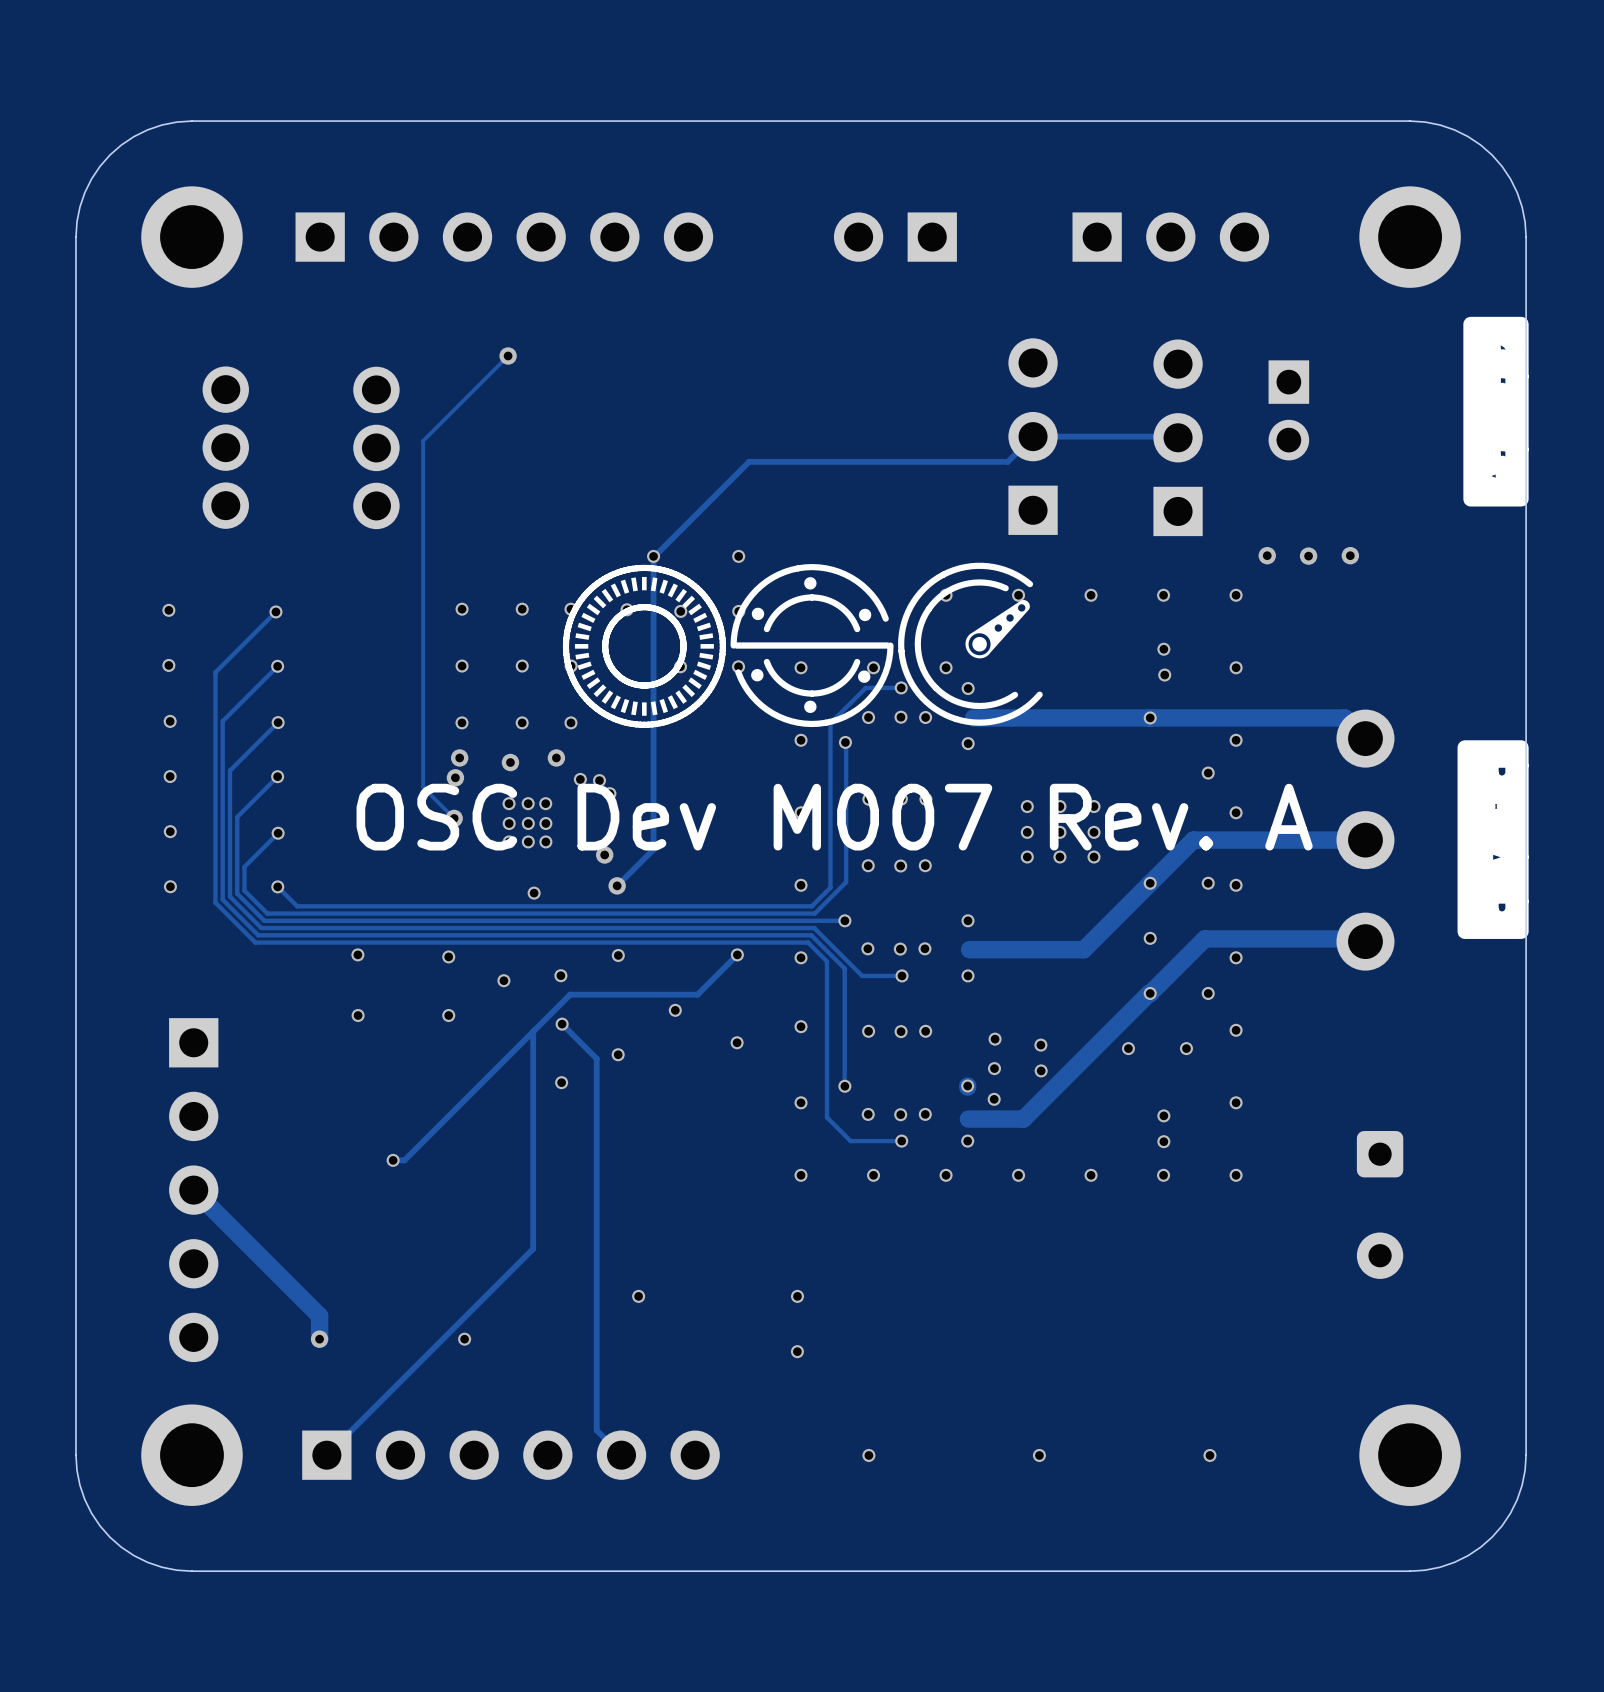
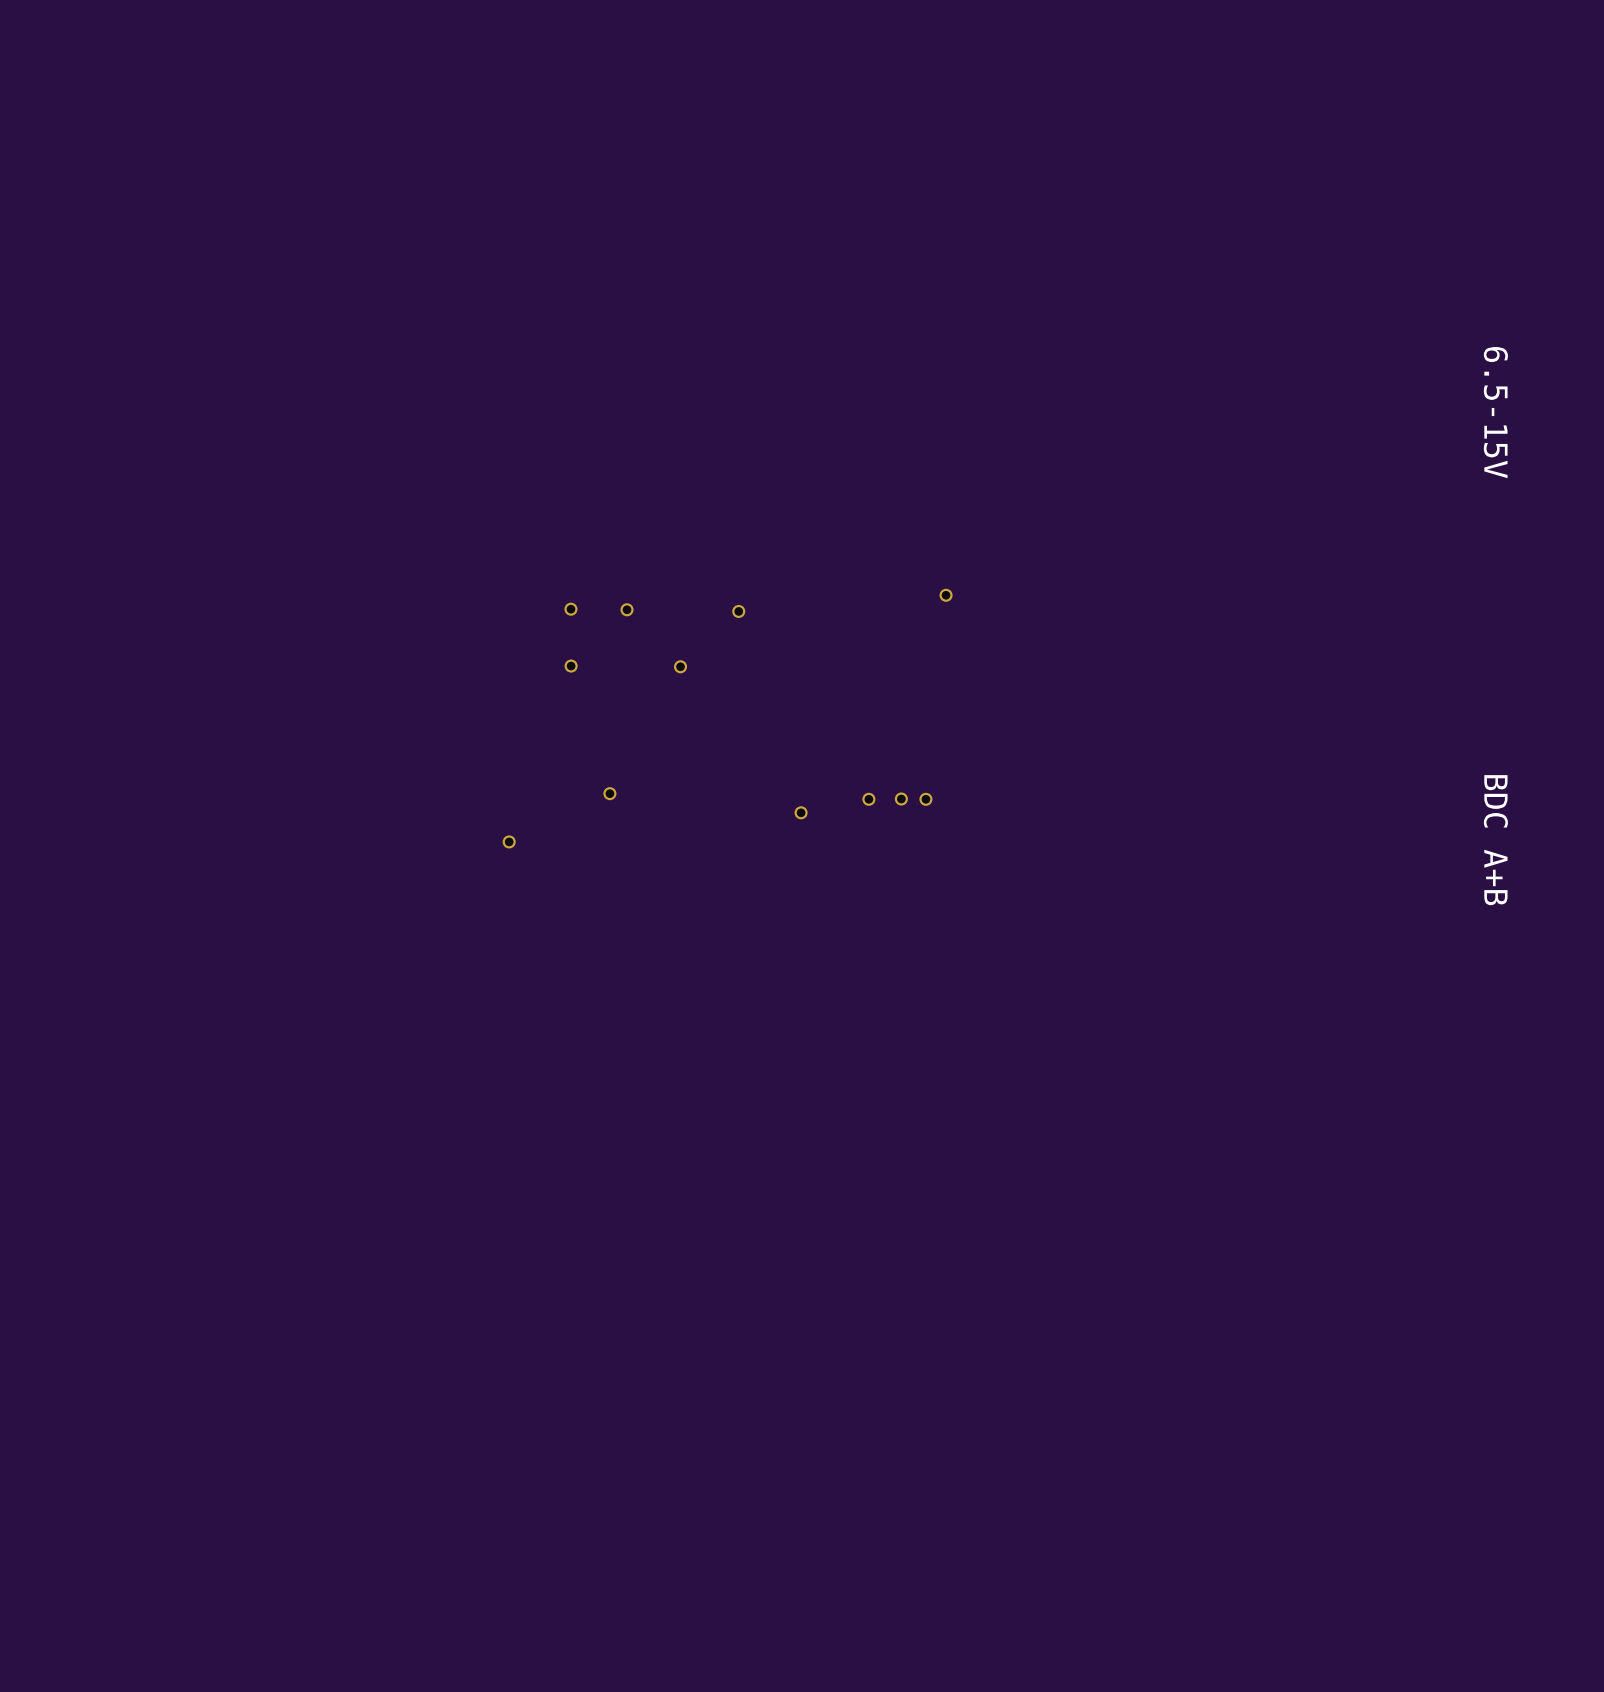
board edge: (1410, 121) (191, 121) (161, 125) (147, 129) (133, 136) (109, 155) (99, 166) (84, 192) (76, 221) (75, 237) (75, 1455) (79, 1485) (84, 1499) (99, 1525) (109, 1537) (133, 1555) (147, 1562) (176, 1570) (191, 1571) (1410, 1571) (1440, 1567) (1454, 1562) (1480, 1547) (1492, 1537) (1510, 1513) (1517, 1499) (1522, 1485) (1526, 1455) (1526, 237) (1525, 221) (1517, 192) (1502, 166) (1492, 155) (1468, 136) (1454, 129) (1425, 122) (1410, 121) -> none
part: (191, 237) -> none
part: (504, 237) -> none
part: (895, 237) -> none
part: (1170, 237) -> none
part: (1410, 237) -> none
drawing: [1463, 316, 1529, 507] -> none
track: (508, 355) (423, 440) (423, 787) (454, 818) -> none
via: (508, 355) -> none
part: (1288, 410) -> none
part: (1033, 436) -> none
track: (1178, 437) (1033, 436) (1007, 461) (749, 461) (653, 556) (653, 849) (617, 885) -> none
part: (1178, 437) -> none
part: (225, 447) -> none
part: (376, 447) -> none
via: (1267, 555) -> none
via: (1350, 555) -> none
via: (653, 556) -> none
via: (738, 556) -> none
via: (1308, 556) -> none
line: (644, 567) (628, 569) (613, 574) (588, 590) (572, 615) (567, 630) (565, 646) (567, 662) (572, 676) (588, 701) (613, 718) (628, 723) (644, 724) (660, 723) (674, 718) (699, 701) (716, 676) (721, 662) (722, 646) (721, 630) (716, 615) (699, 590) (674, 574) (660, 569) (644, 567) -> none
drawing: [574, 576, 889, 716] -> none
drawing: [804, 577, 817, 590] -> none
line: (1030, 584) (1010, 572) (988, 566) (965, 567) (943, 574) (924, 588) (910, 606) (902, 627) (901, 651) (906, 673) (918, 693) (935, 708) (956, 719) (978, 722) (1001, 719) (1022, 710) (1039, 694) -> none
line: (1005, 588) (990, 583) (974, 582) (958, 586) (944, 593) (932, 604) (923, 618) (918, 633) (918, 649) (921, 665) (928, 679) (940, 691) (953, 700) (968, 705) (984, 705) (1000, 702) (1015, 694) -> none
via: (1018, 595) -> none
via: (1091, 595) -> none
via: (1163, 595) -> none
via: (1236, 595) -> none
drawing: [965, 600, 1030, 659] -> none
line: (648, 607) (632, 608) (619, 616) (609, 627) (605, 642) (607, 658) (614, 671) (625, 680) (640, 685) (656, 683) (669, 676) (678, 665) (683, 650) (681, 634) (674, 621) (663, 611) (648, 607) -> none
via: (462, 609) -> none
via: (522, 609) -> none
via: (168, 610) -> none
track: (275, 611) (215, 672) (215, 902) (255, 942) (808, 942) (826, 961) (826, 1117) (850, 1141) (901, 1141) -> none
via: (275, 611) -> none
via: (680, 611) -> none
line: (885, 618) (871, 594) (851, 577) (826, 568) (798, 568) (772, 577) (751, 595) (738, 618) (733, 645) -> none
line: (857, 629) (850, 616) (839, 606) (826, 599) (812, 597) (797, 599) (784, 606) (774, 616) (766, 629) -> none
line: (890, 645) (885, 672) (872, 695) (851, 713) (825, 722) (798, 722) (772, 713) (752, 696) (738, 672) -> none
via: (1163, 649) -> none
line: (857, 661) (850, 674) (839, 684) (826, 691) (812, 693) (797, 691) (784, 684) (774, 674) (766, 661) -> none
via: (168, 665) -> none
track: (277, 666) (222, 721) (222, 899) (258, 935) (811, 935) (844, 968) (844, 1086) -> none
via: (277, 666) -> none
via: (462, 666) -> none
via: (522, 666) -> none
via: (738, 666) -> none
via: (801, 667) -> none
via: (873, 667) -> none
via: (946, 667) -> none
via: (1236, 667) -> none
via: (1164, 675) -> none
track: (900, 687) (865, 687) (830, 723) (830, 887) (811, 906) (297, 906) (277, 886) -> none
via: (901, 687) -> none
via: (968, 688) -> none
drawing: [804, 700, 817, 713] -> none
via: (868, 717) -> none
via: (901, 717) -> none
via: (925, 717) -> none
track: (973, 717) (1344, 717) (1365, 738) -> none
via: (1150, 717) -> none
via: (170, 721) -> none
track: (278, 722) (229, 770) (229, 896) (261, 928) (814, 928) (862, 975) (902, 975) -> none
via: (278, 722) -> none
via: (462, 722) -> none
via: (522, 722) -> none
via: (570, 722) -> none
via: (801, 740) -> none
via: (1236, 740) -> none
drawing: [1457, 740, 1529, 939] -> none
track: (844, 742) (846, 882) (814, 913) (267, 913) (244, 890) (244, 866) (278, 833) -> none
via: (845, 742) -> none
via: (968, 743) -> none
via: (459, 757) -> none
via: (556, 757) -> none
via: (510, 762) -> none
via: (1208, 773) -> none
via: (170, 776) -> none
track: (277, 776) (237, 817) (237, 893) (264, 920) (844, 921) -> none
via: (277, 776) -> none
via: (455, 777) -> none
via: (580, 779) -> none
via: (599, 780) -> none
via: (509, 803) -> none
via: (528, 803) -> none
via: (545, 803) -> none
via: (1027, 806) -> none
via: (1059, 806) -> none
via: (1094, 806) -> none
via: (1236, 812) -> none
text: OSC Dev M007 Rev. A (834, 817) -> none
via: (454, 818) -> none
via: (509, 823) -> none
via: (528, 823) -> none
via: (545, 823) -> none
via: (170, 831) -> none
via: (1027, 832) -> none
via: (1059, 832) -> none
via: (1094, 832) -> none
via: (278, 833) -> none
track: (1365, 840) (1193, 840) (1083, 949) (969, 949) -> none
part: (1365, 840) -> none
via: (528, 841) -> none
via: (545, 841) -> none
via: (604, 854) -> none
via: (1027, 857) -> none
via: (1059, 857) -> none
via: (1094, 857) -> none
via: (868, 865) -> none
via: (925, 865) -> none
via: (900, 866) -> none
via: (1150, 883) -> none
via: (1208, 883) -> none
via: (617, 885) -> none
via: (801, 885) -> none
via: (1236, 885) -> none
via: (170, 886) -> none
via: (277, 886) -> none
via: (534, 893) -> none
via: (844, 920) -> none
via: (968, 920) -> none
via: (1150, 938) -> none
track: (1357, 941) (1365, 941) (1362, 938) (1204, 938) (1023, 1119) (968, 1119) -> none
via: (867, 948) -> none
via: (924, 948) -> none
via: (900, 949) -> none
via: (357, 954) -> none
track: (737, 954) (697, 994) (570, 994) (404, 1160) (393, 1160) -> none
via: (737, 954) -> none
via: (618, 955) -> none
via: (448, 956) -> none
via: (801, 957) -> none
via: (1236, 957) -> none
via: (560, 975) -> none
via: (902, 975) -> none
via: (968, 975) -> none
via: (503, 980) -> none
via: (1150, 993) -> none
via: (1208, 993) -> none
via: (675, 1010) -> none
via: (358, 1015) -> none
via: (448, 1015) -> none
track: (562, 1024) (596, 1058) (596, 1430) (621, 1455) -> none
via: (562, 1024) -> none
via: (801, 1026) -> none
via: (1236, 1030) -> none
track: (533, 1031) (533, 1248) (326, 1455) -> none
via: (868, 1031) -> none
via: (901, 1031) -> none
via: (925, 1031) -> none
via: (995, 1039) -> none
via: (737, 1042) -> none
via: (1040, 1045) -> none
via: (1128, 1048) -> none
via: (1186, 1048) -> none
via: (618, 1054) -> none
via: (994, 1068) -> none
via: (1041, 1070) -> none
via: (561, 1082) -> none
track: (967, 1085) (967, 1087) -> none
via: (967, 1085) -> none
via: (844, 1086) -> none
via: (994, 1099) -> none
via: (801, 1102) -> none
via: (1236, 1102) -> none
via: (868, 1114) -> none
via: (900, 1114) -> none
via: (925, 1114) -> none
via: (1163, 1115) -> none
via: (901, 1141) -> none
via: (967, 1141) -> none
via: (1163, 1141) -> none
via: (393, 1160) -> none
via: (801, 1175) -> none
via: (873, 1175) -> none
via: (946, 1175) -> none
via: (1018, 1175) -> none
via: (1091, 1175) -> none
via: (1163, 1175) -> none
via: (1236, 1175) -> none
track: (193, 1190) (319, 1315) (319, 1339) -> none
part: (193, 1190) -> none
part: (1380, 1204) -> none
via: (638, 1296) -> none
via: (797, 1296) -> none
via: (319, 1339) -> none
via: (464, 1339) -> none
via: (797, 1351) -> none
part: (191, 1455) -> none
part: (511, 1455) -> none
via: (868, 1455) -> none
via: (1039, 1455) -> none
via: (1209, 1455) -> none
part: (1410, 1455) -> none

